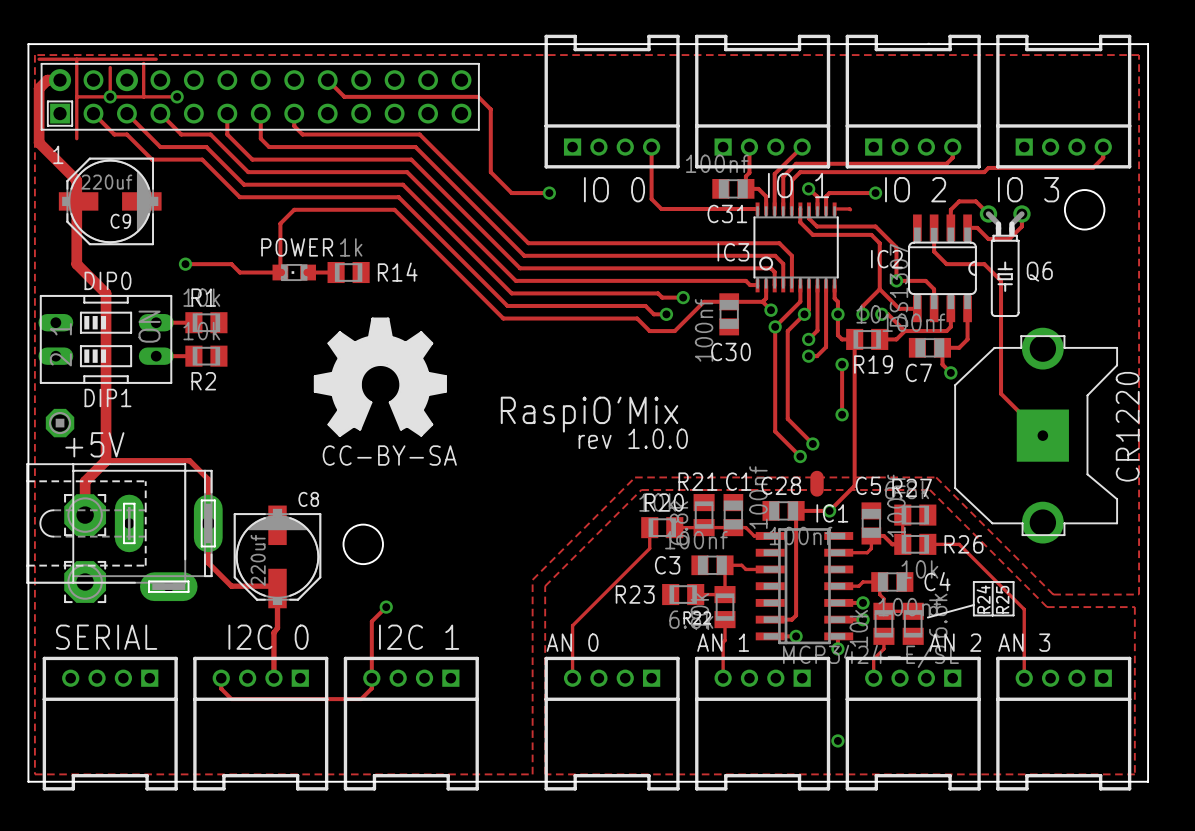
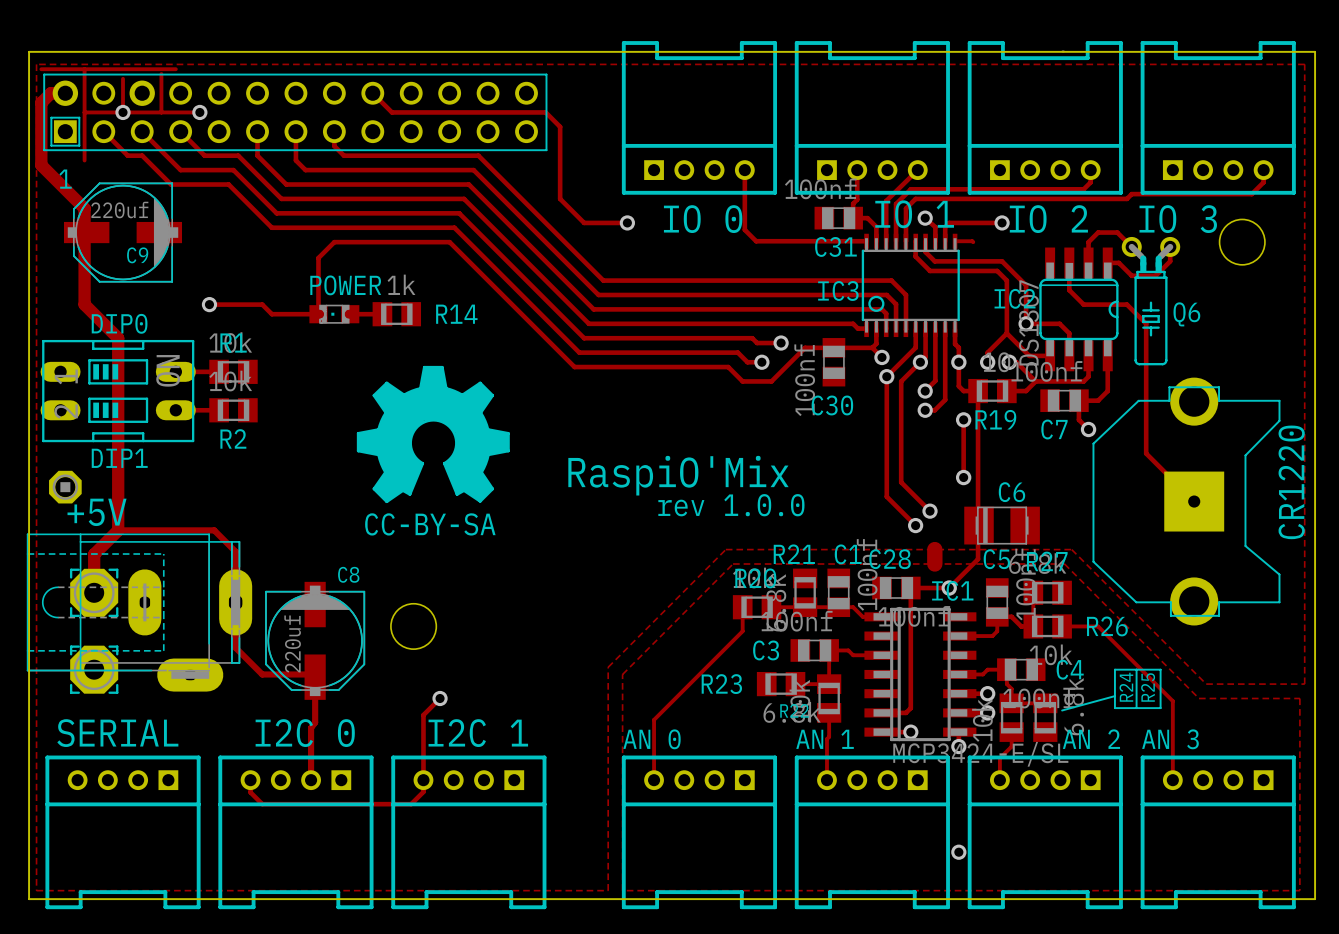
C6: none -> (1002, 525)

